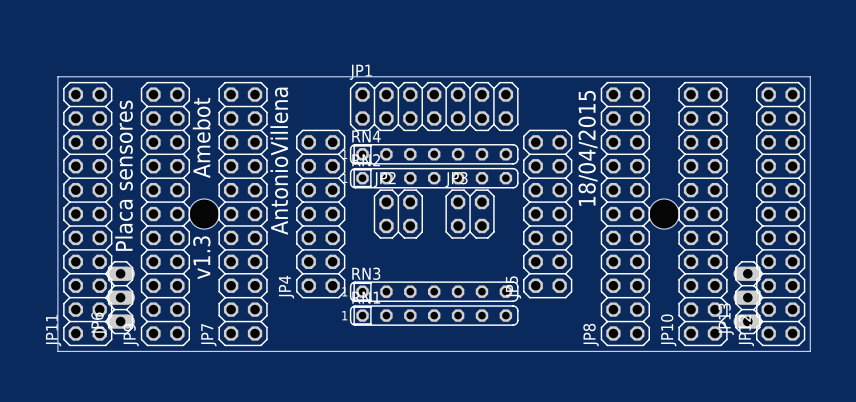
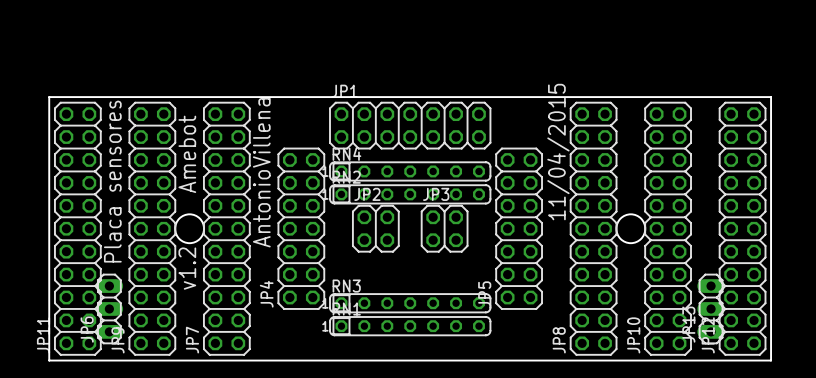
text: 18/04/2015 (588, 148) -> 11/04/2015 (558, 152)
text: v1.3 (201, 257) -> v1.2 (187, 268)

